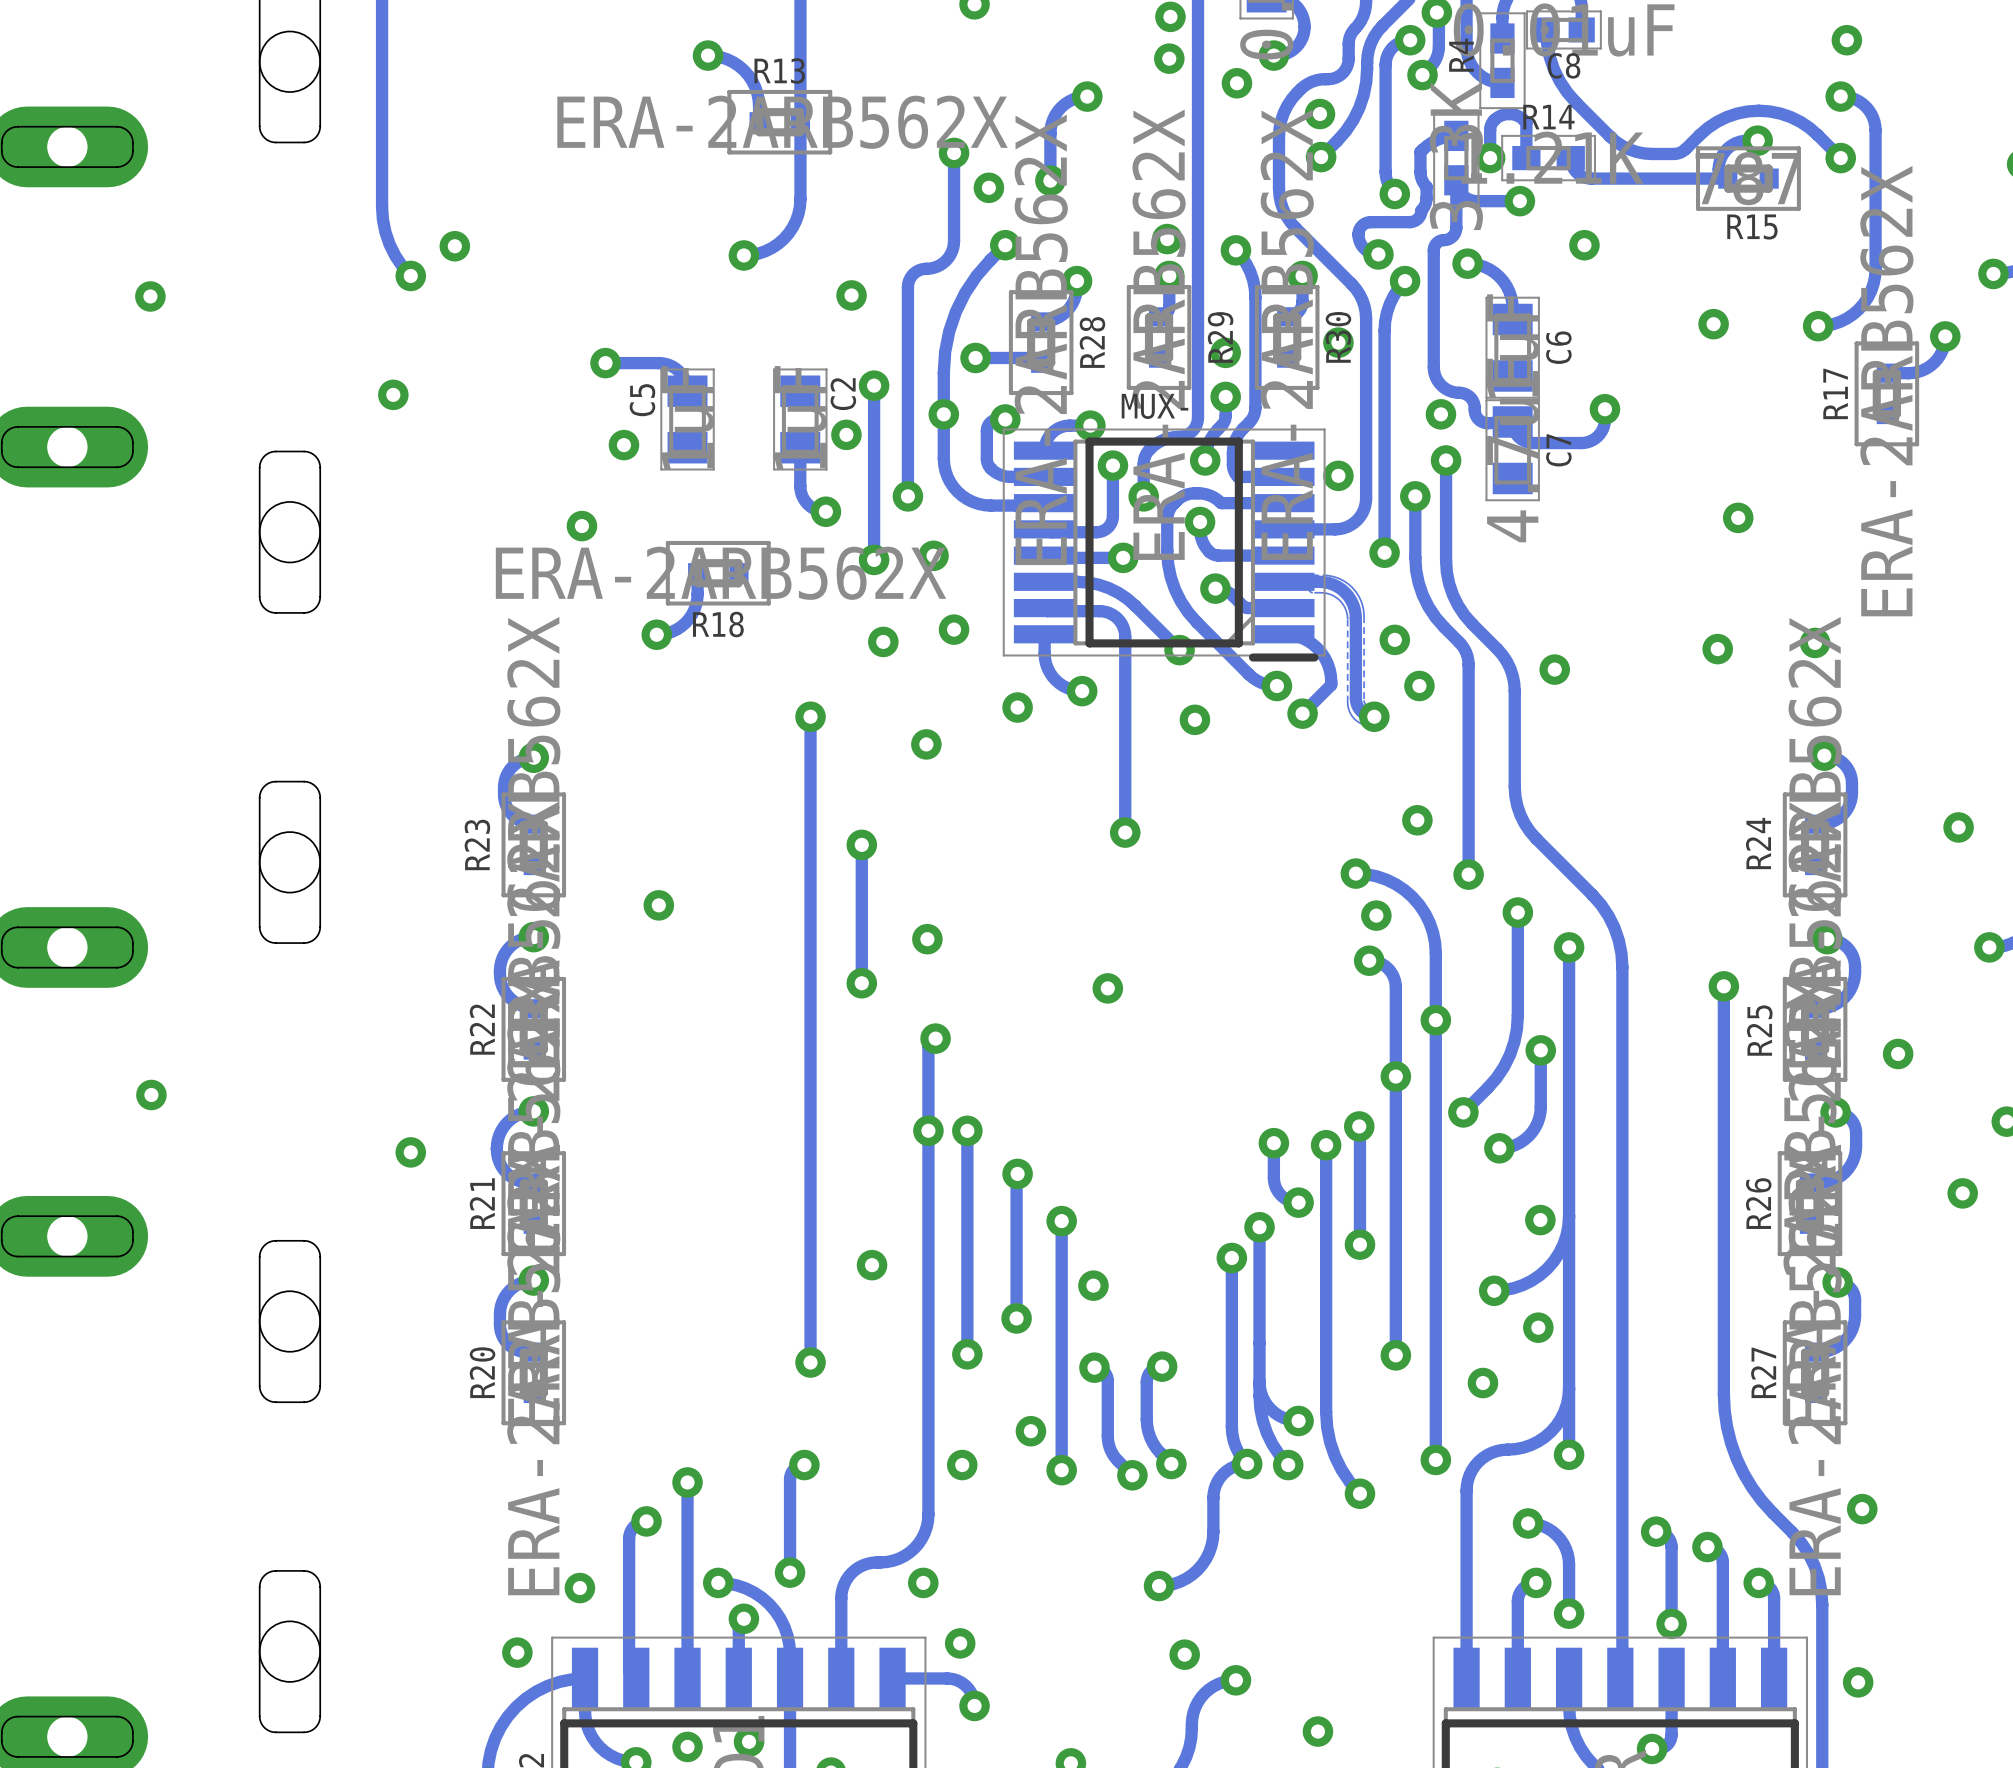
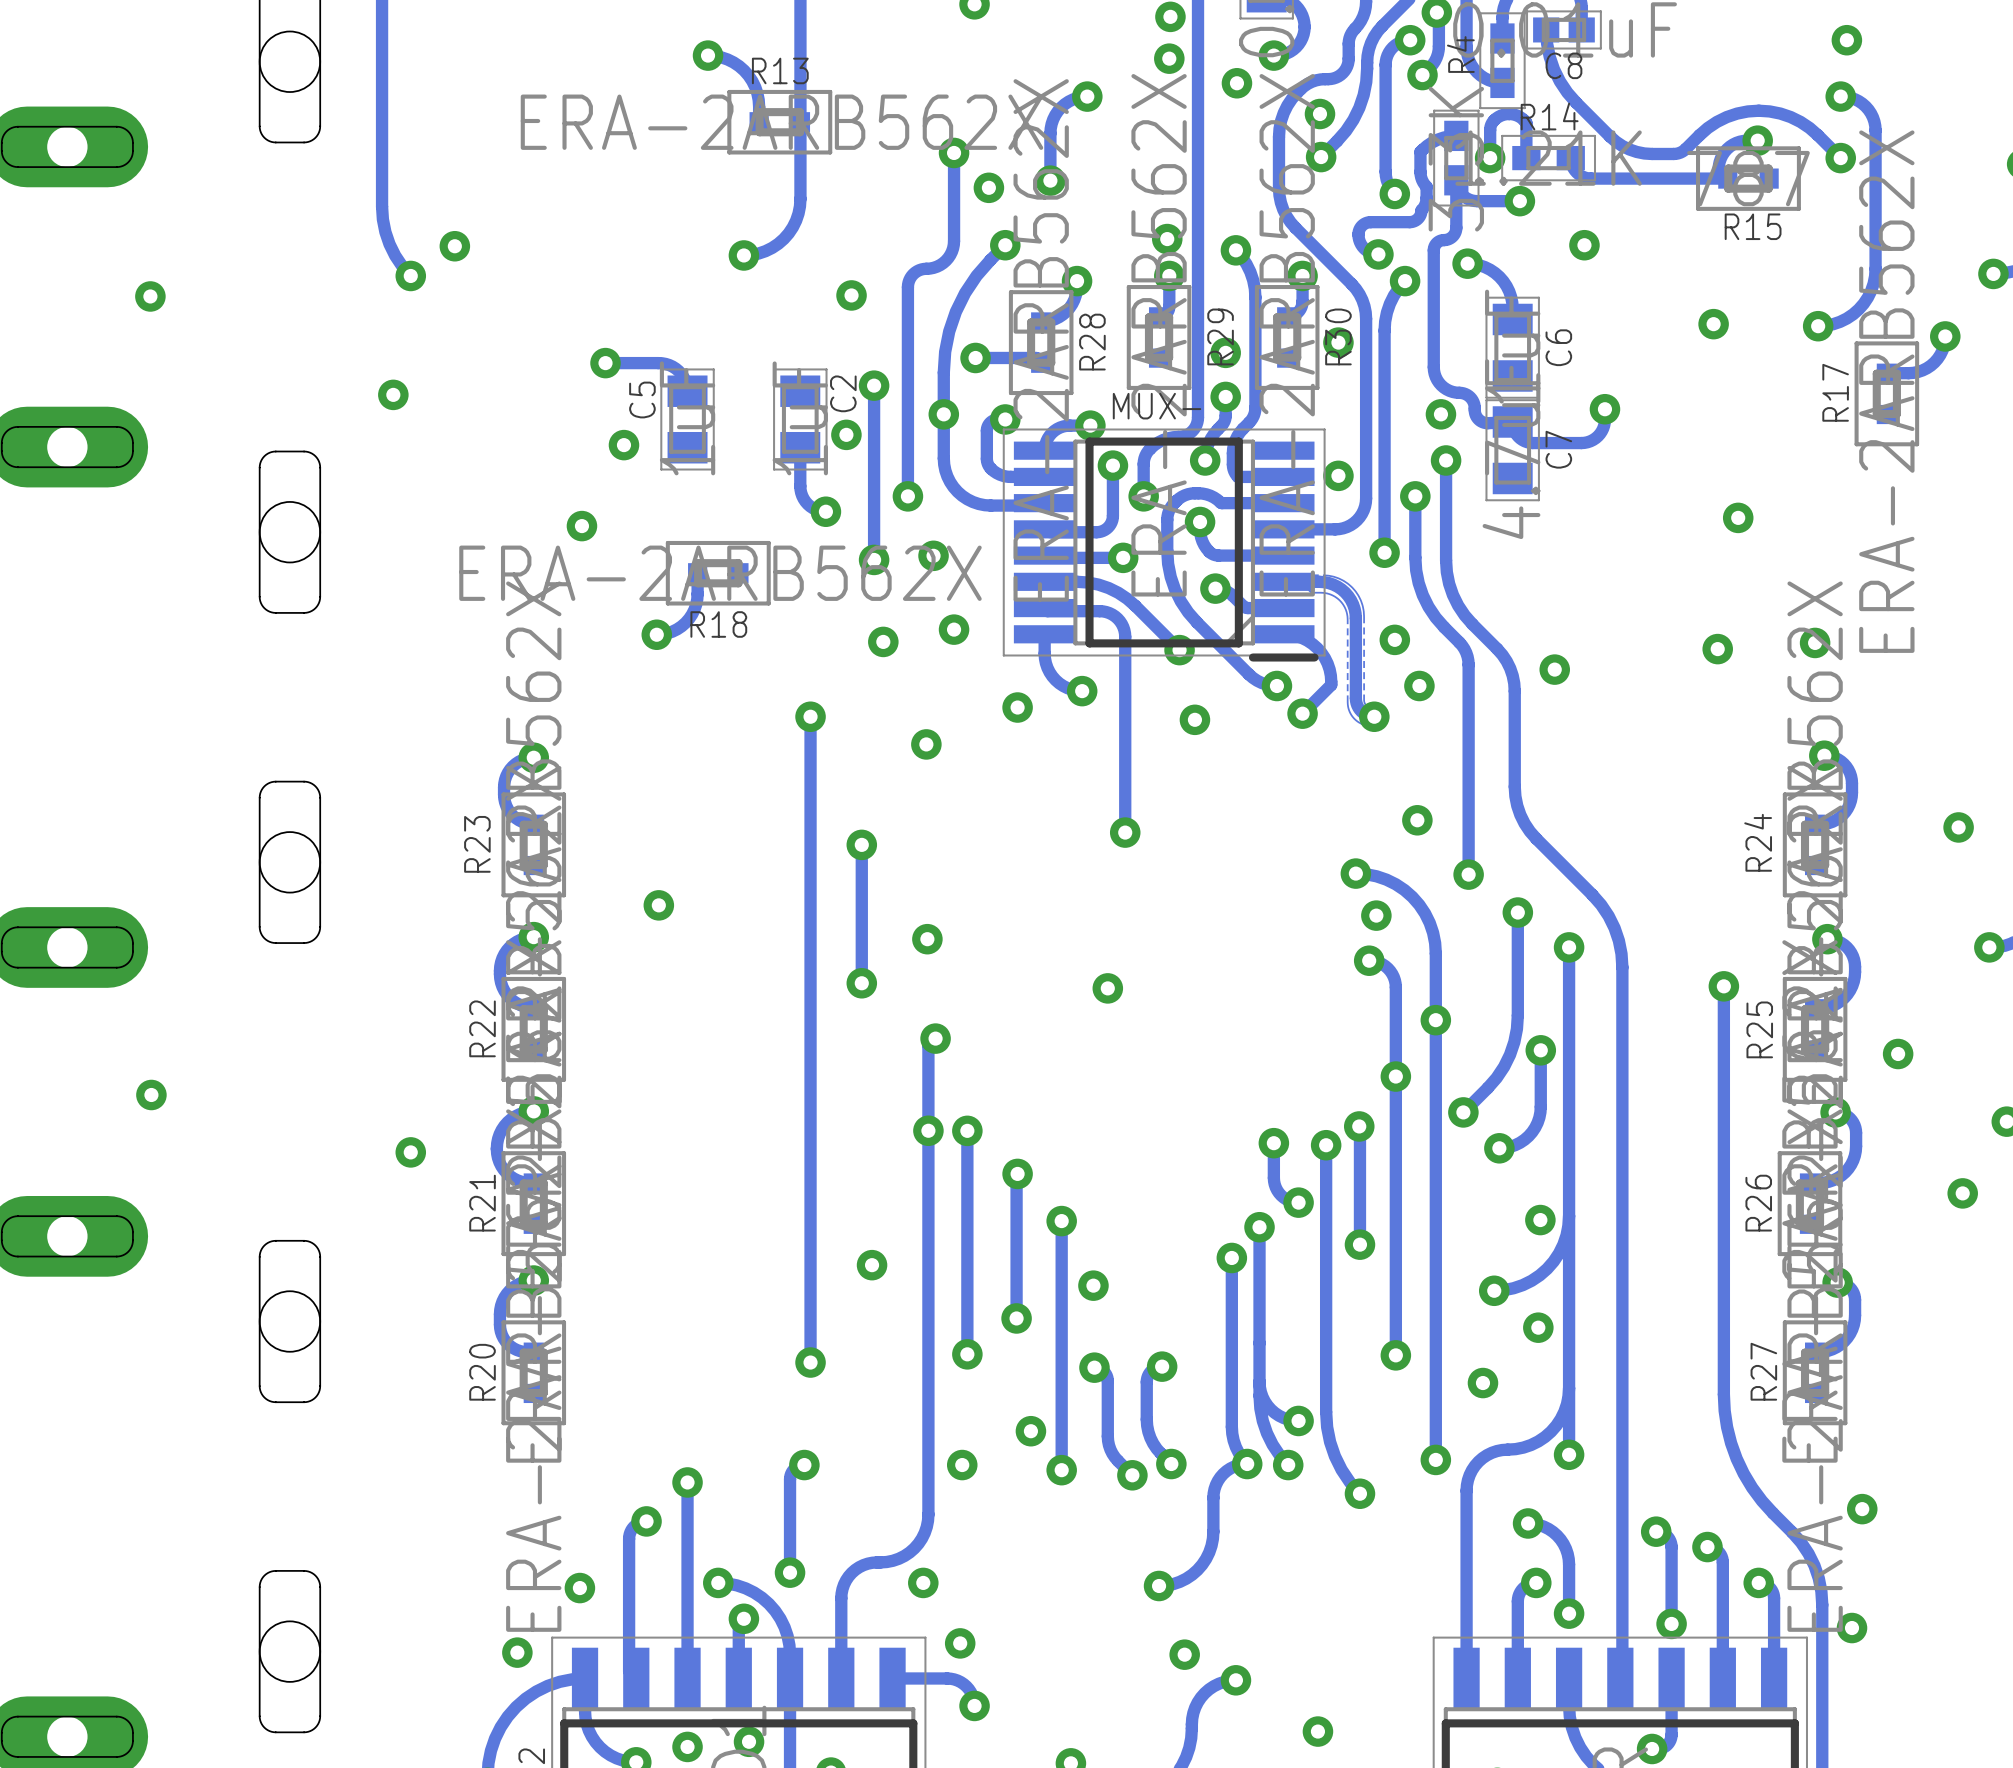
via position: (1858, 1682) -> (1852, 1628)

